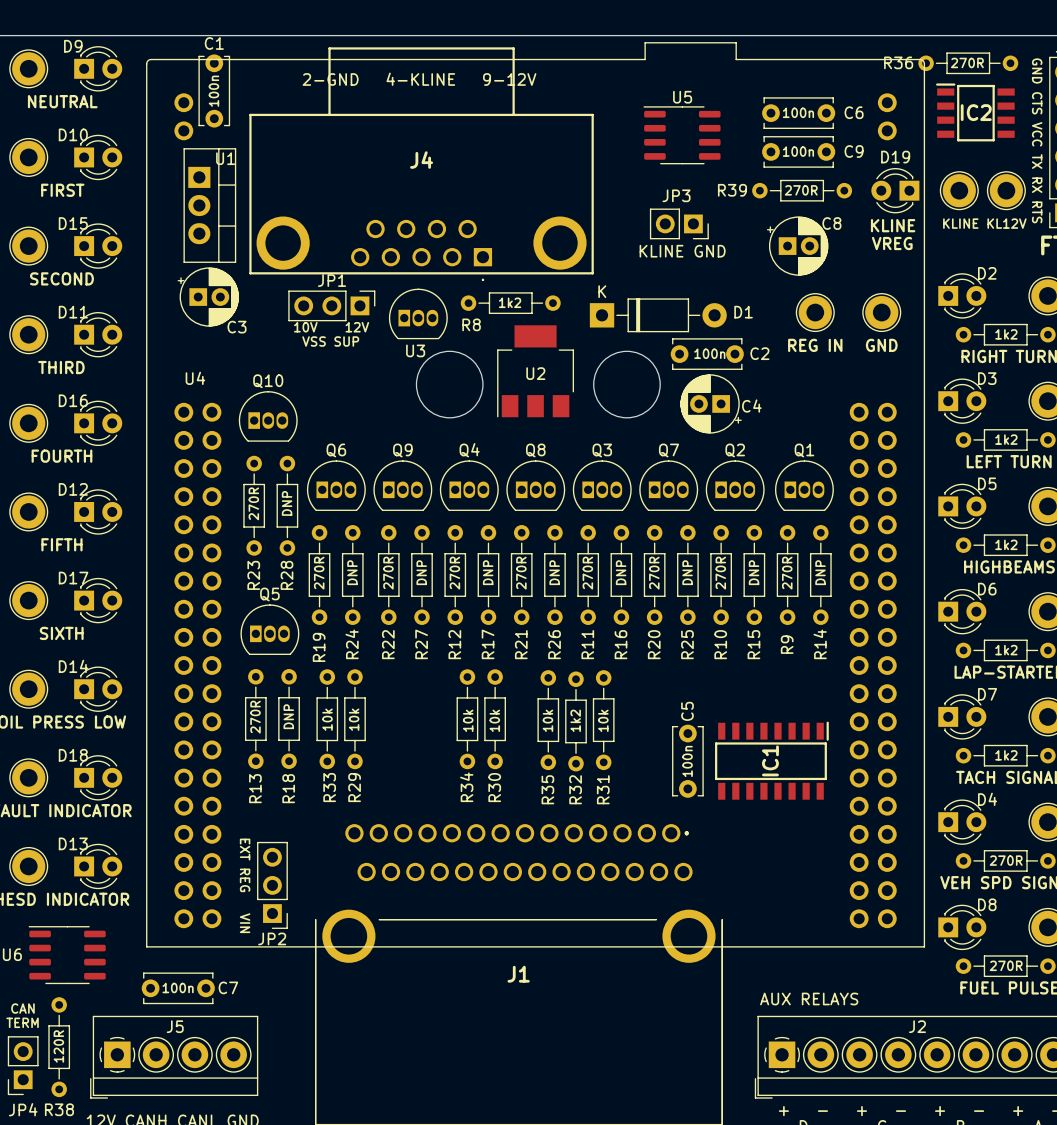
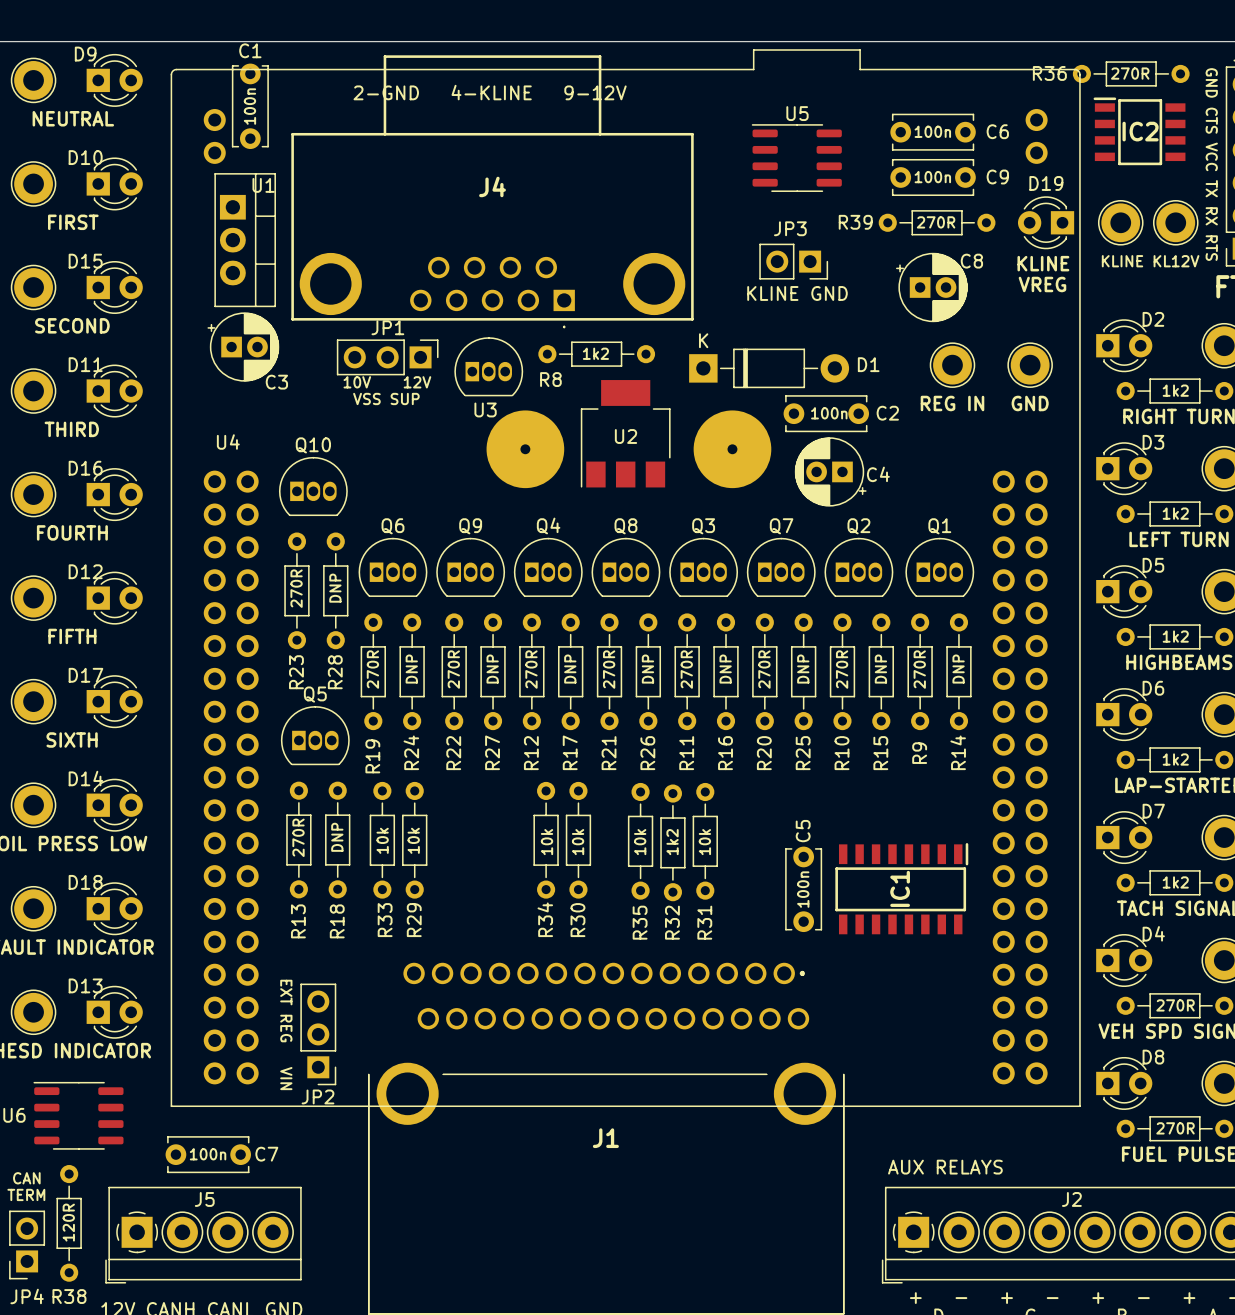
U4 footprint: [146, 42, 926, 948] -> [170, 49, 1081, 1108]

